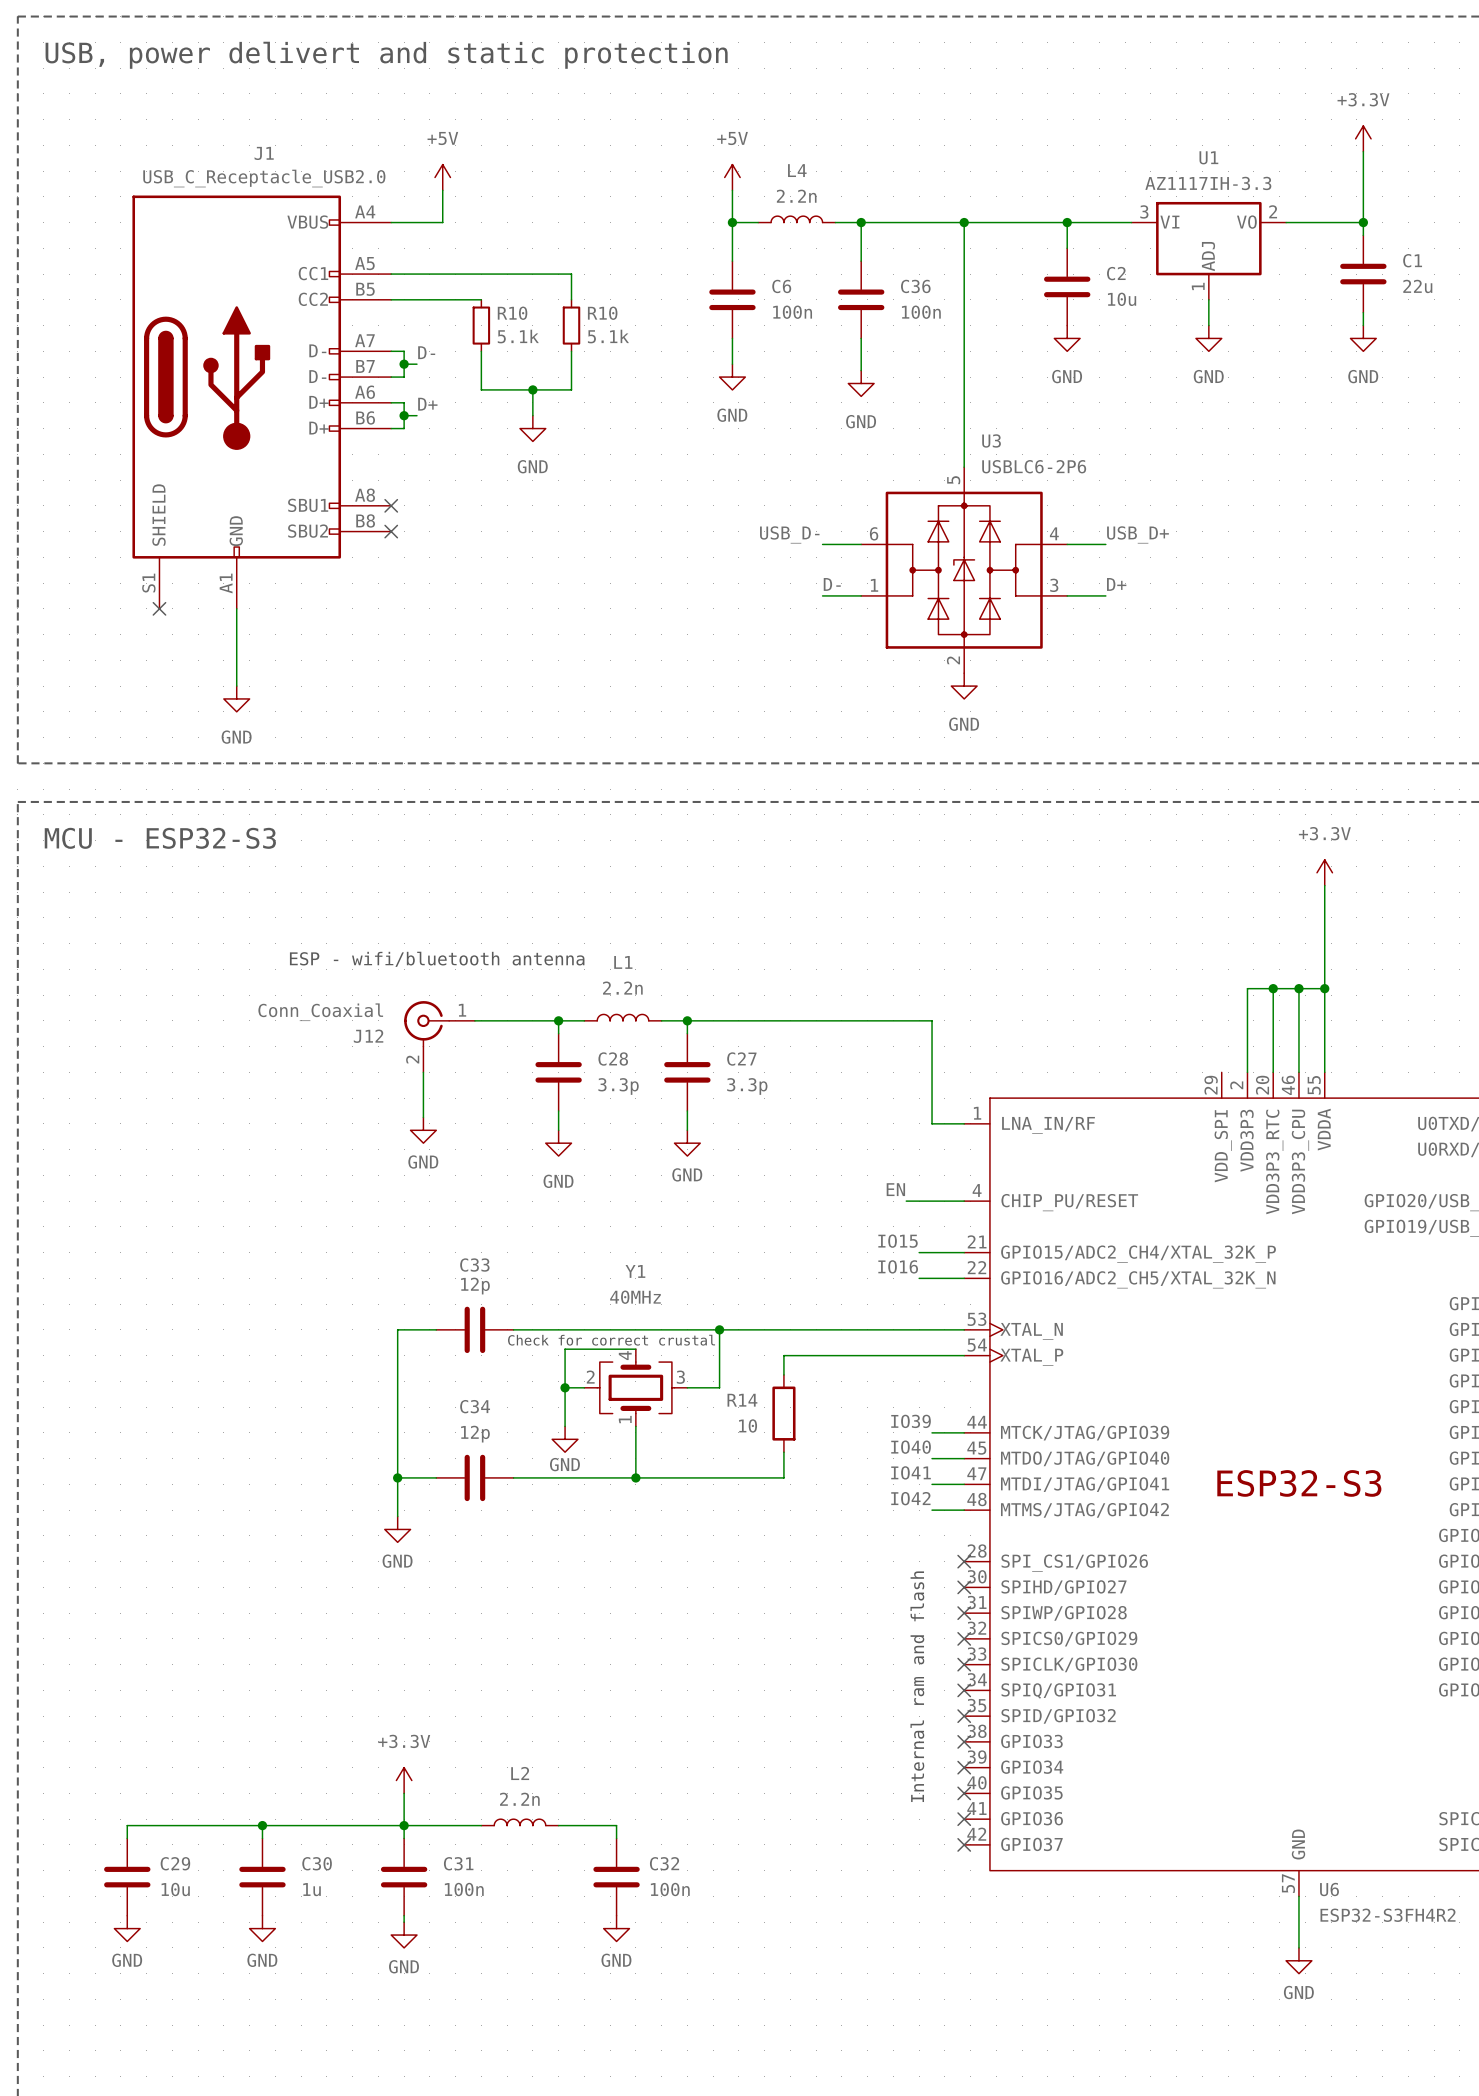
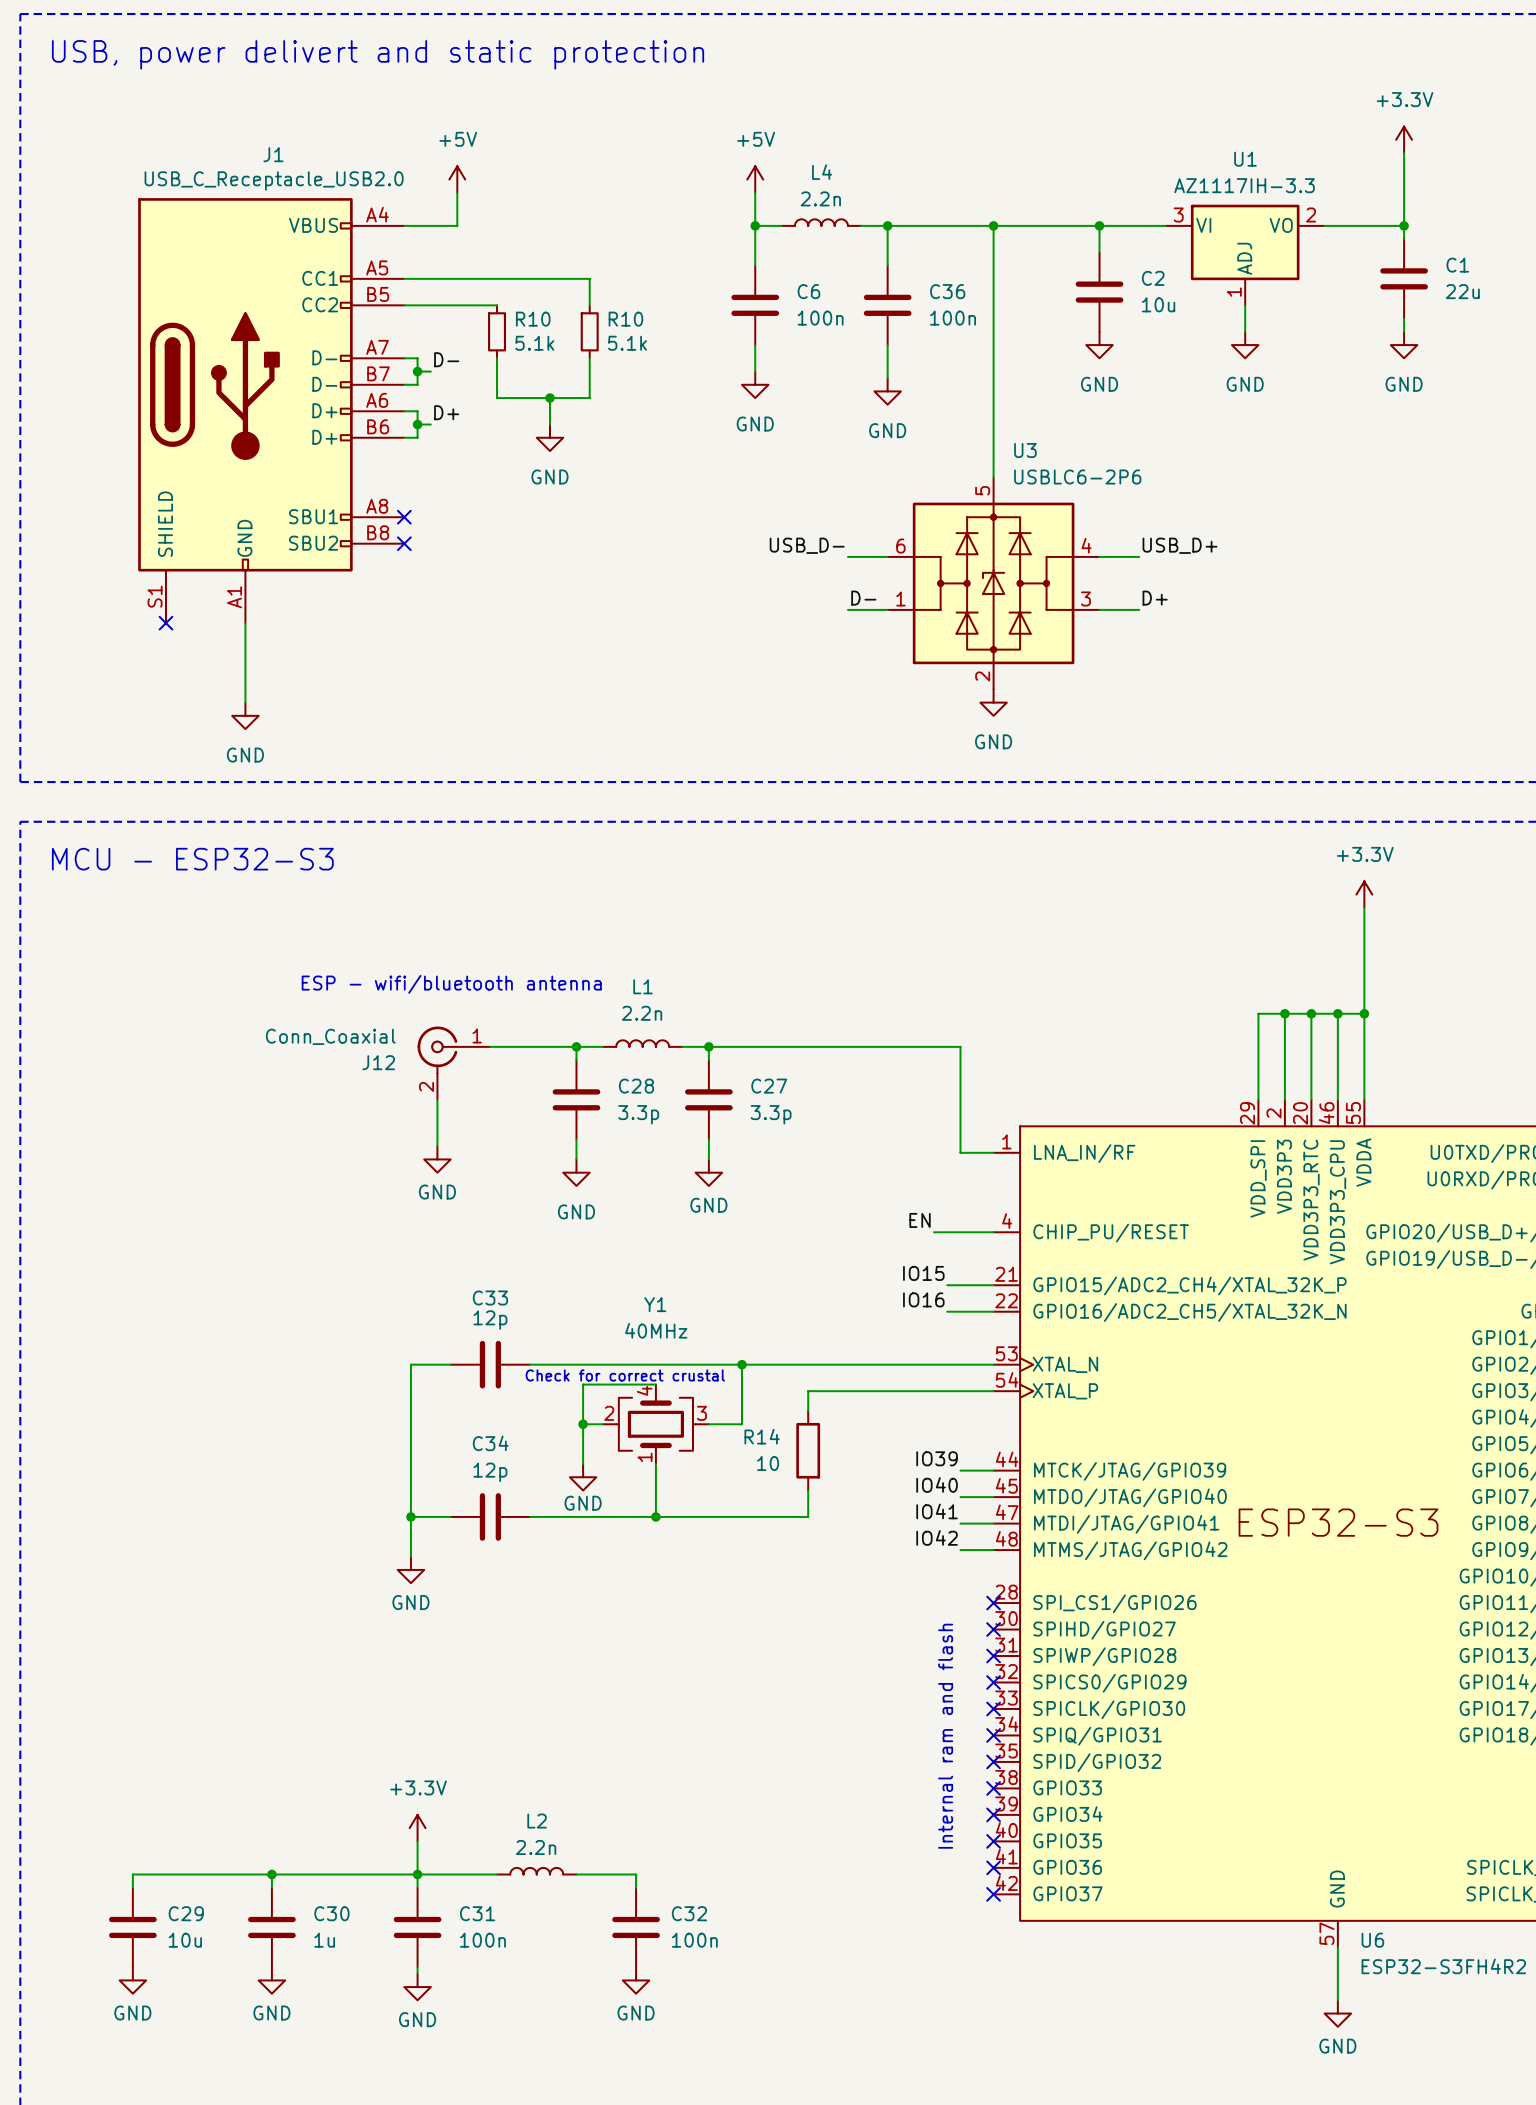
wire: none -> (1284, 1013) (1258, 1013) (1258, 1099)
junction: none -> (1284, 1013)

